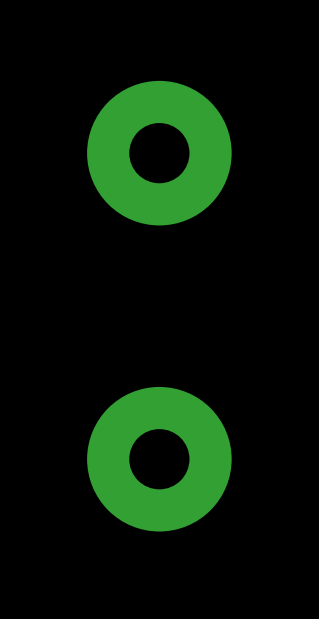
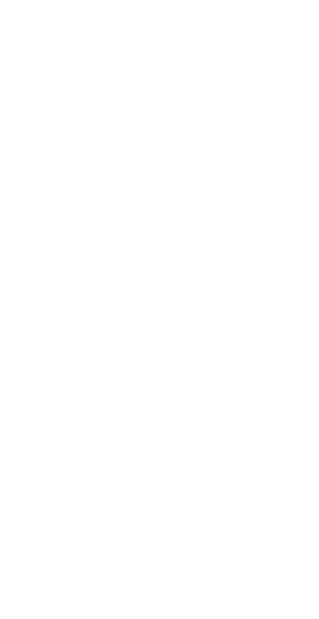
part: (159, 153) -> none
part: (159, 459) -> none

